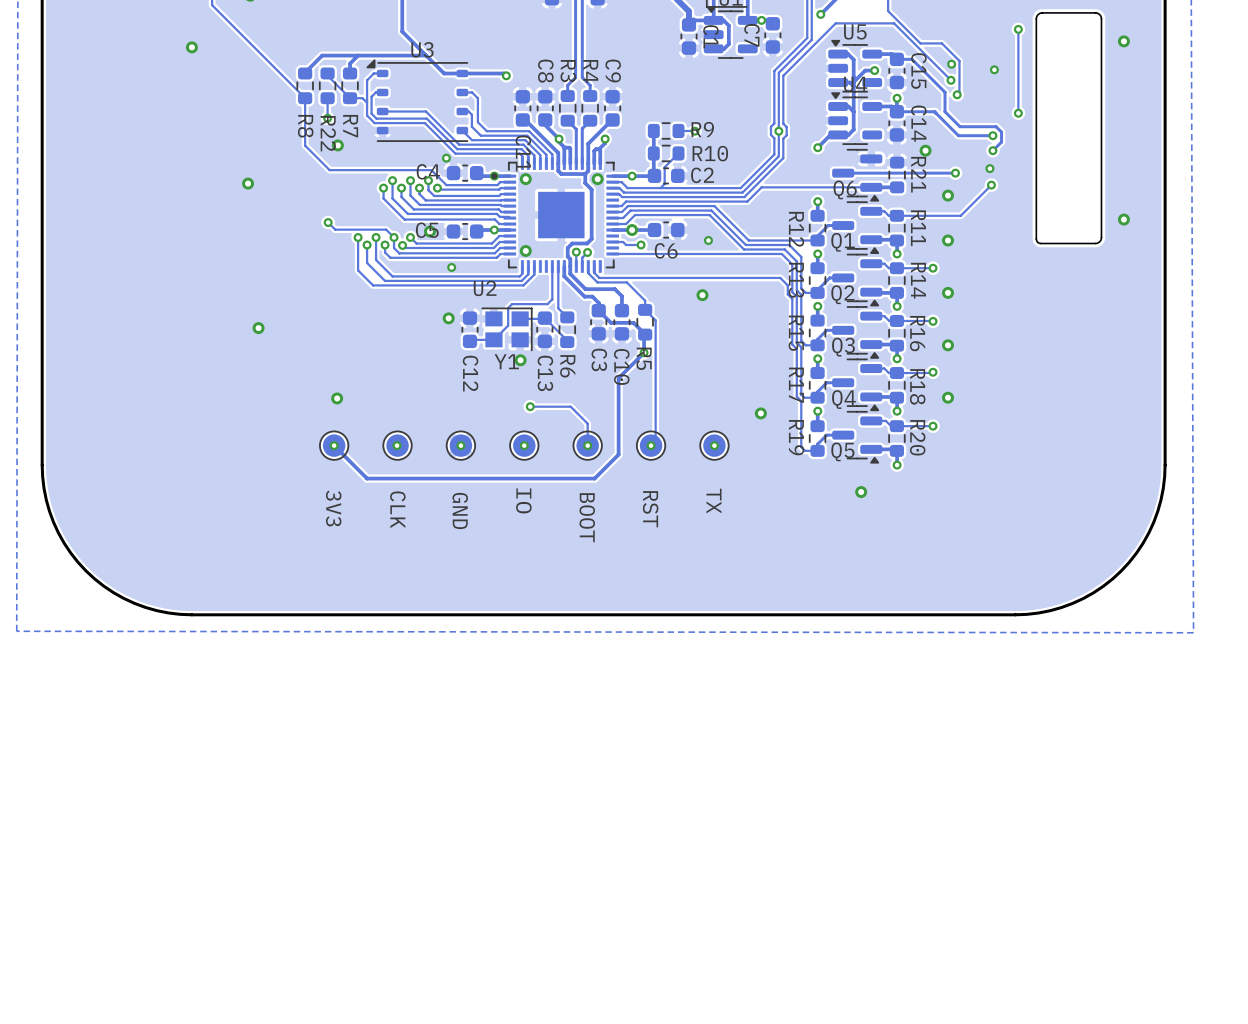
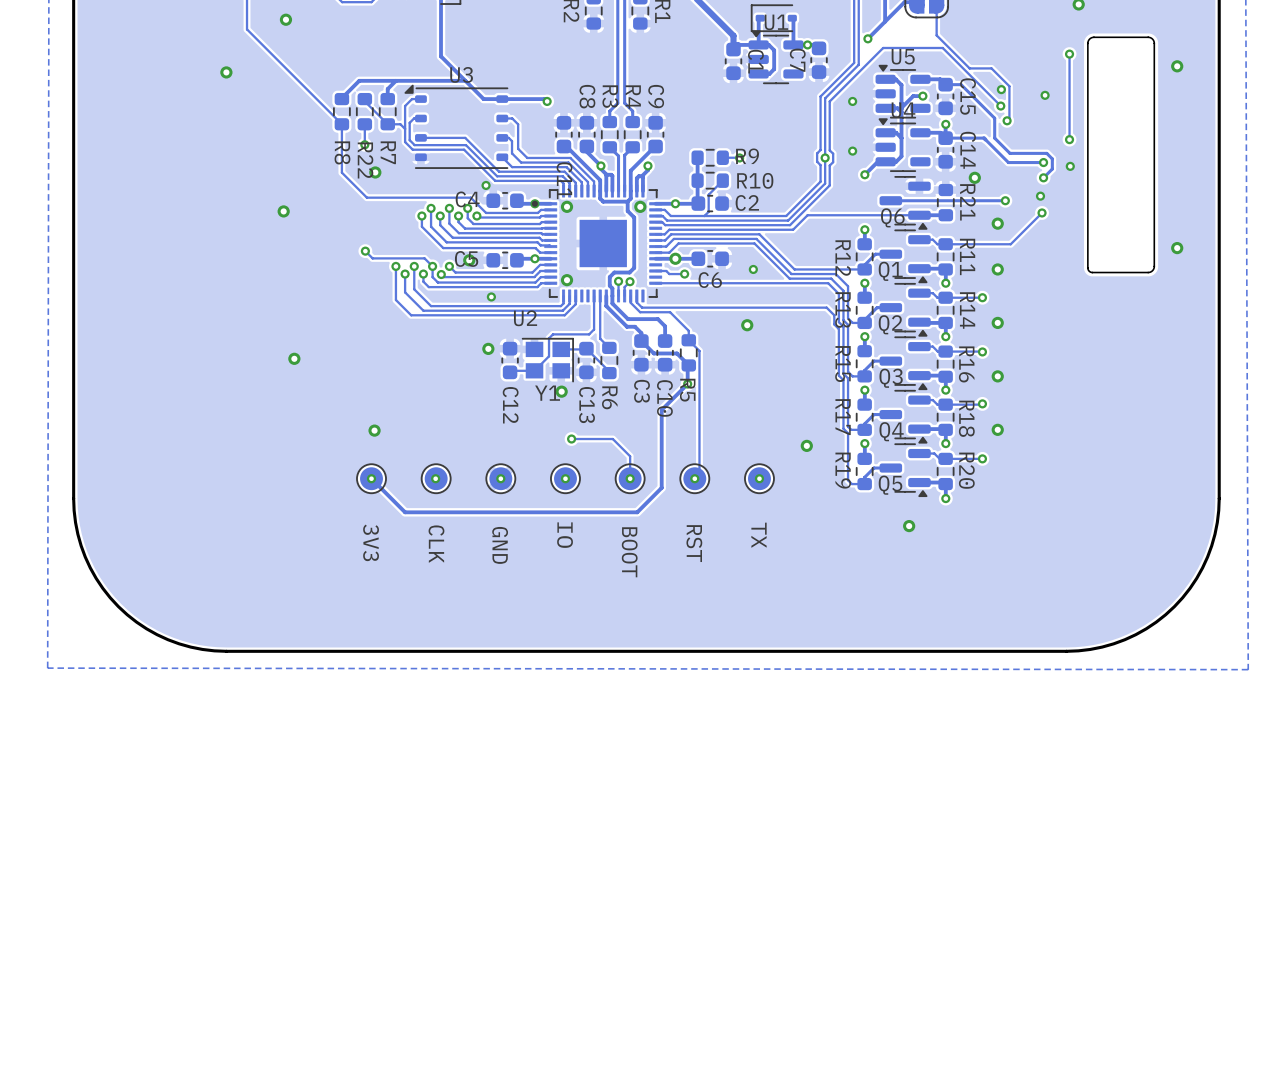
via: none -> (852, 101)
via: none -> (852, 151)
via: none -> (1070, 166)

